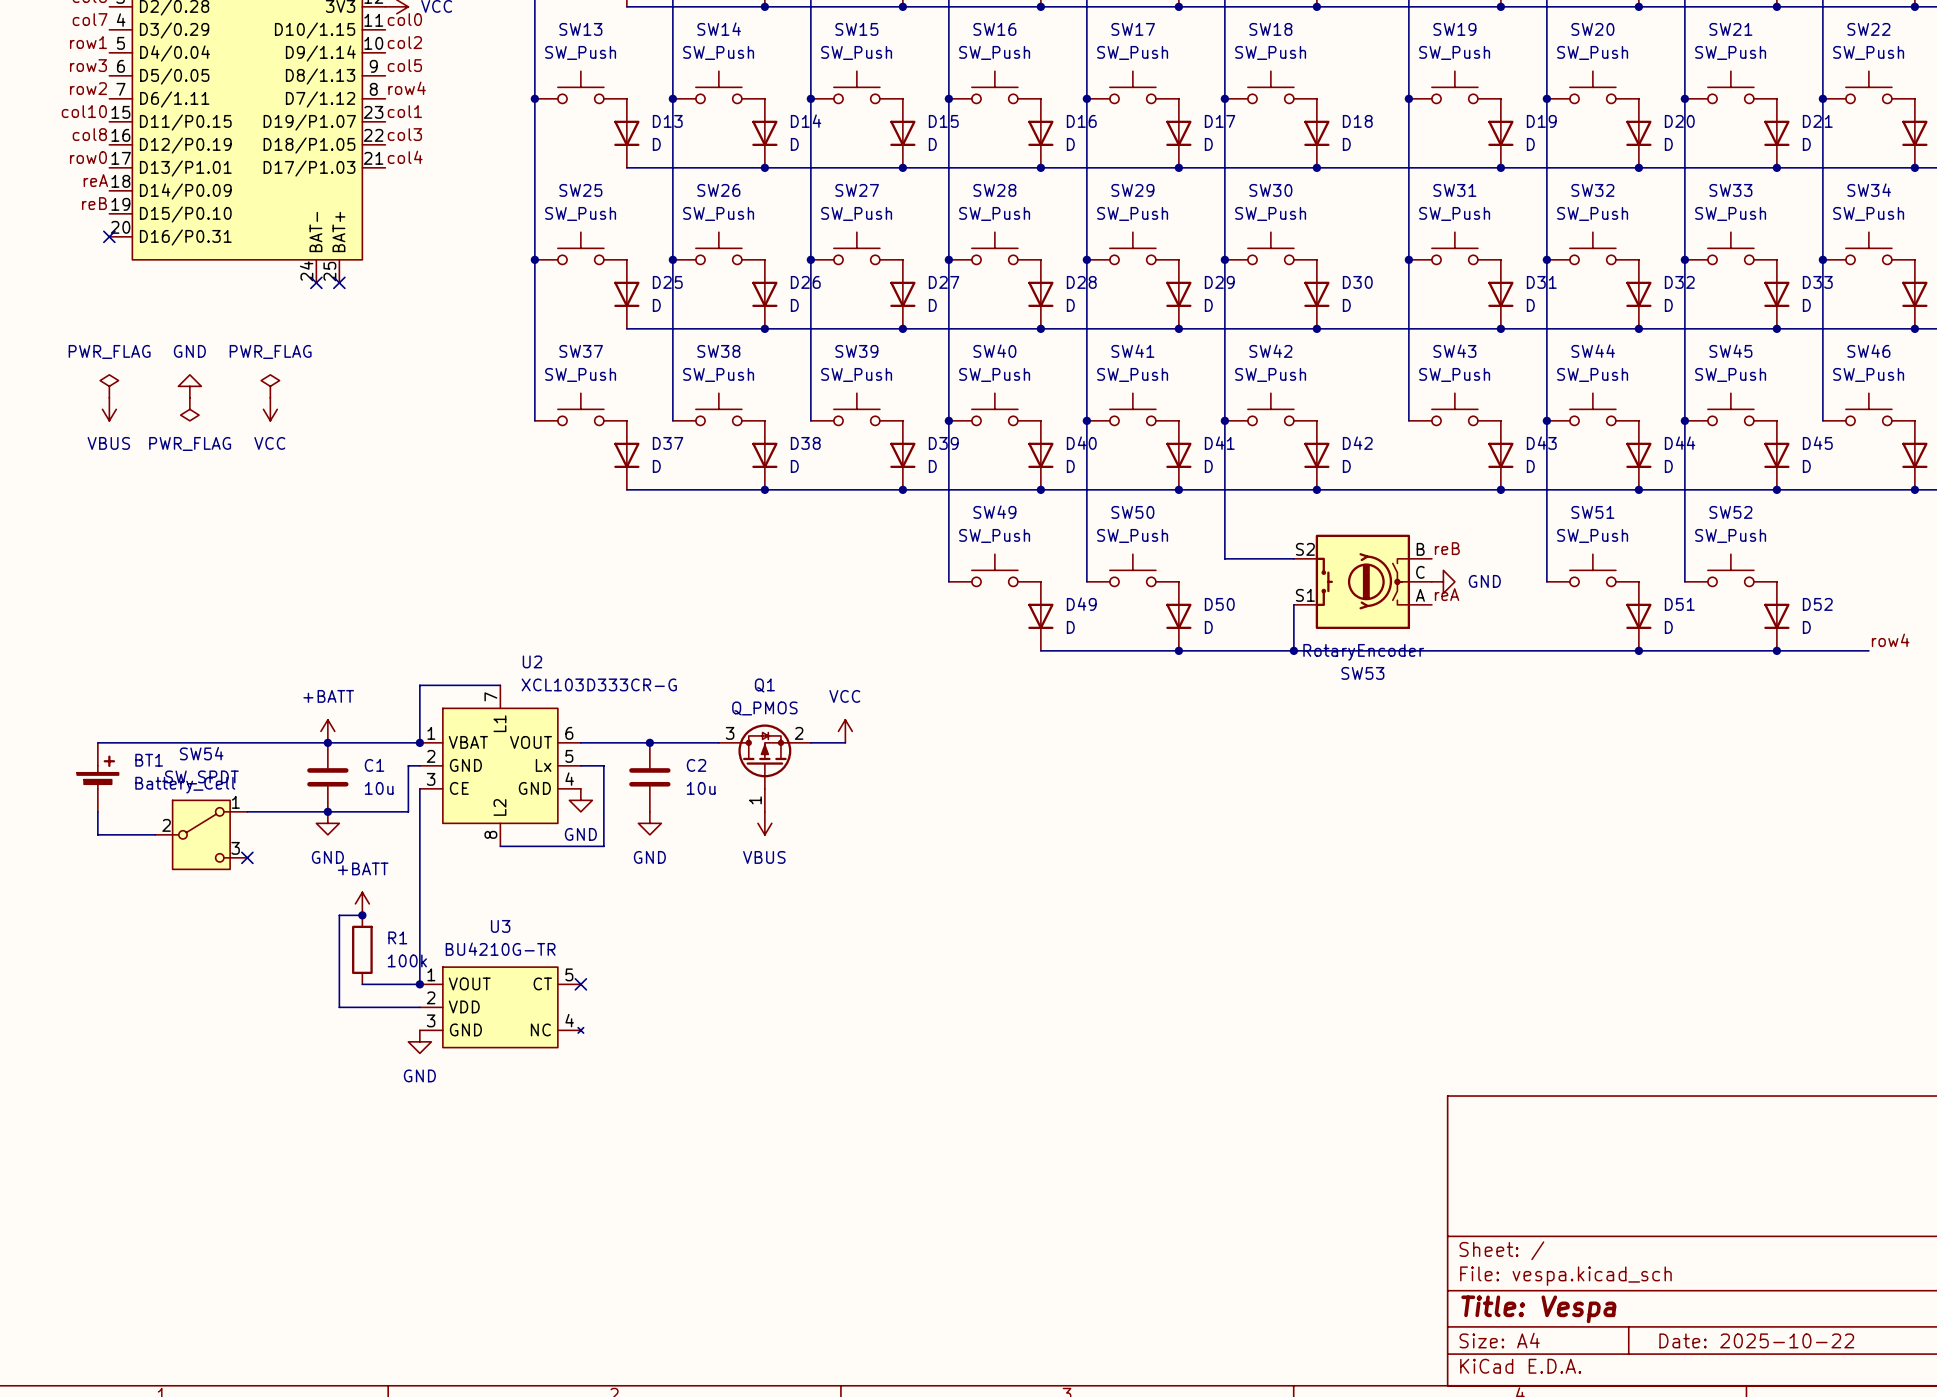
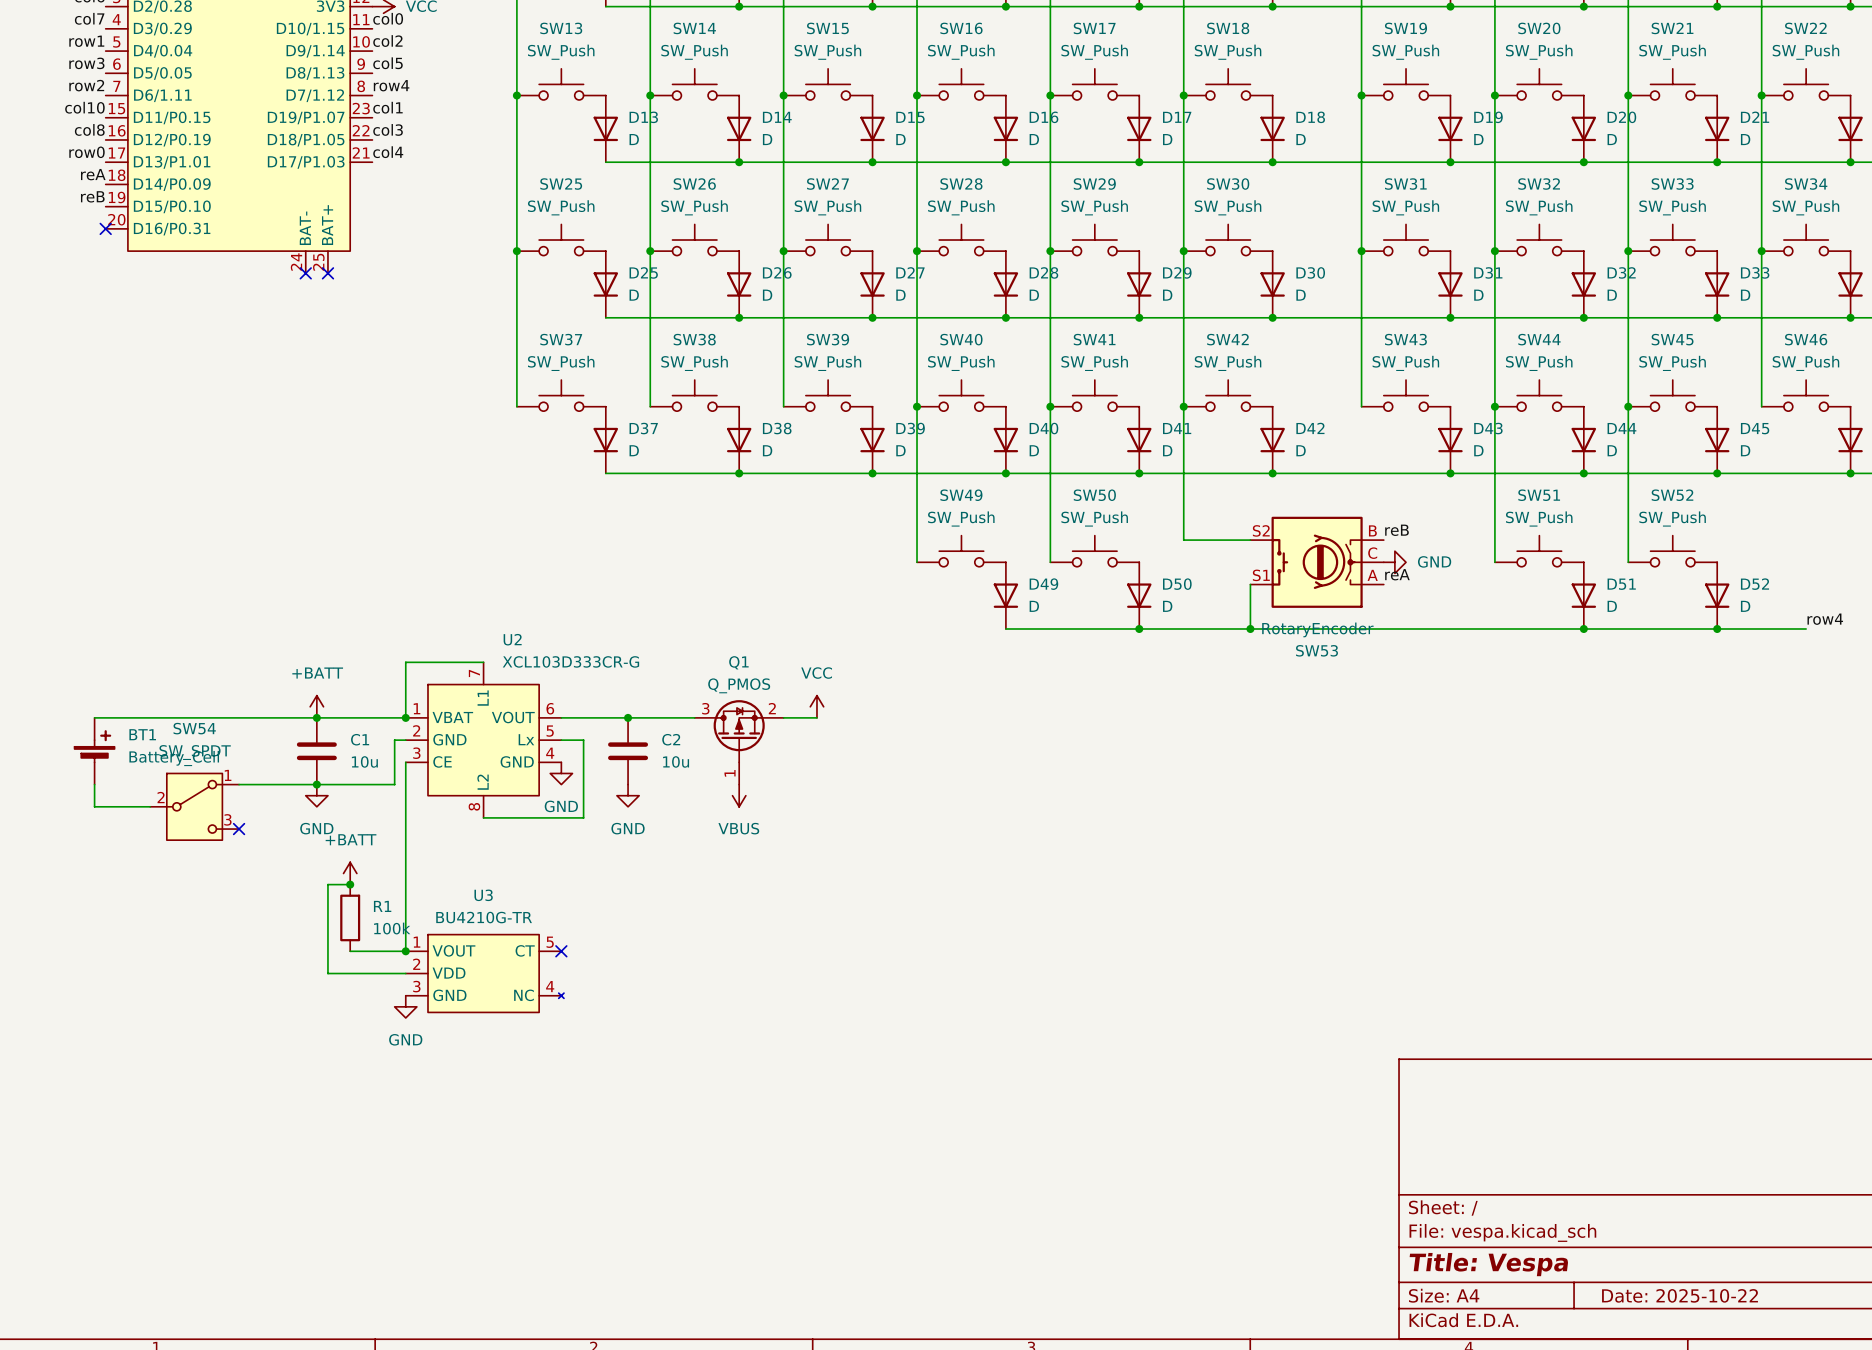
power symbol: PWR_FLAG (109, 386) -> none
power symbol: GND (189, 386) -> none
power symbol: PWR_FLAG (270, 386) -> none
power symbol: VBUS (109, 409) -> none
power symbol: PWR_FLAG (189, 409) -> none
power symbol: VCC (270, 409) -> none

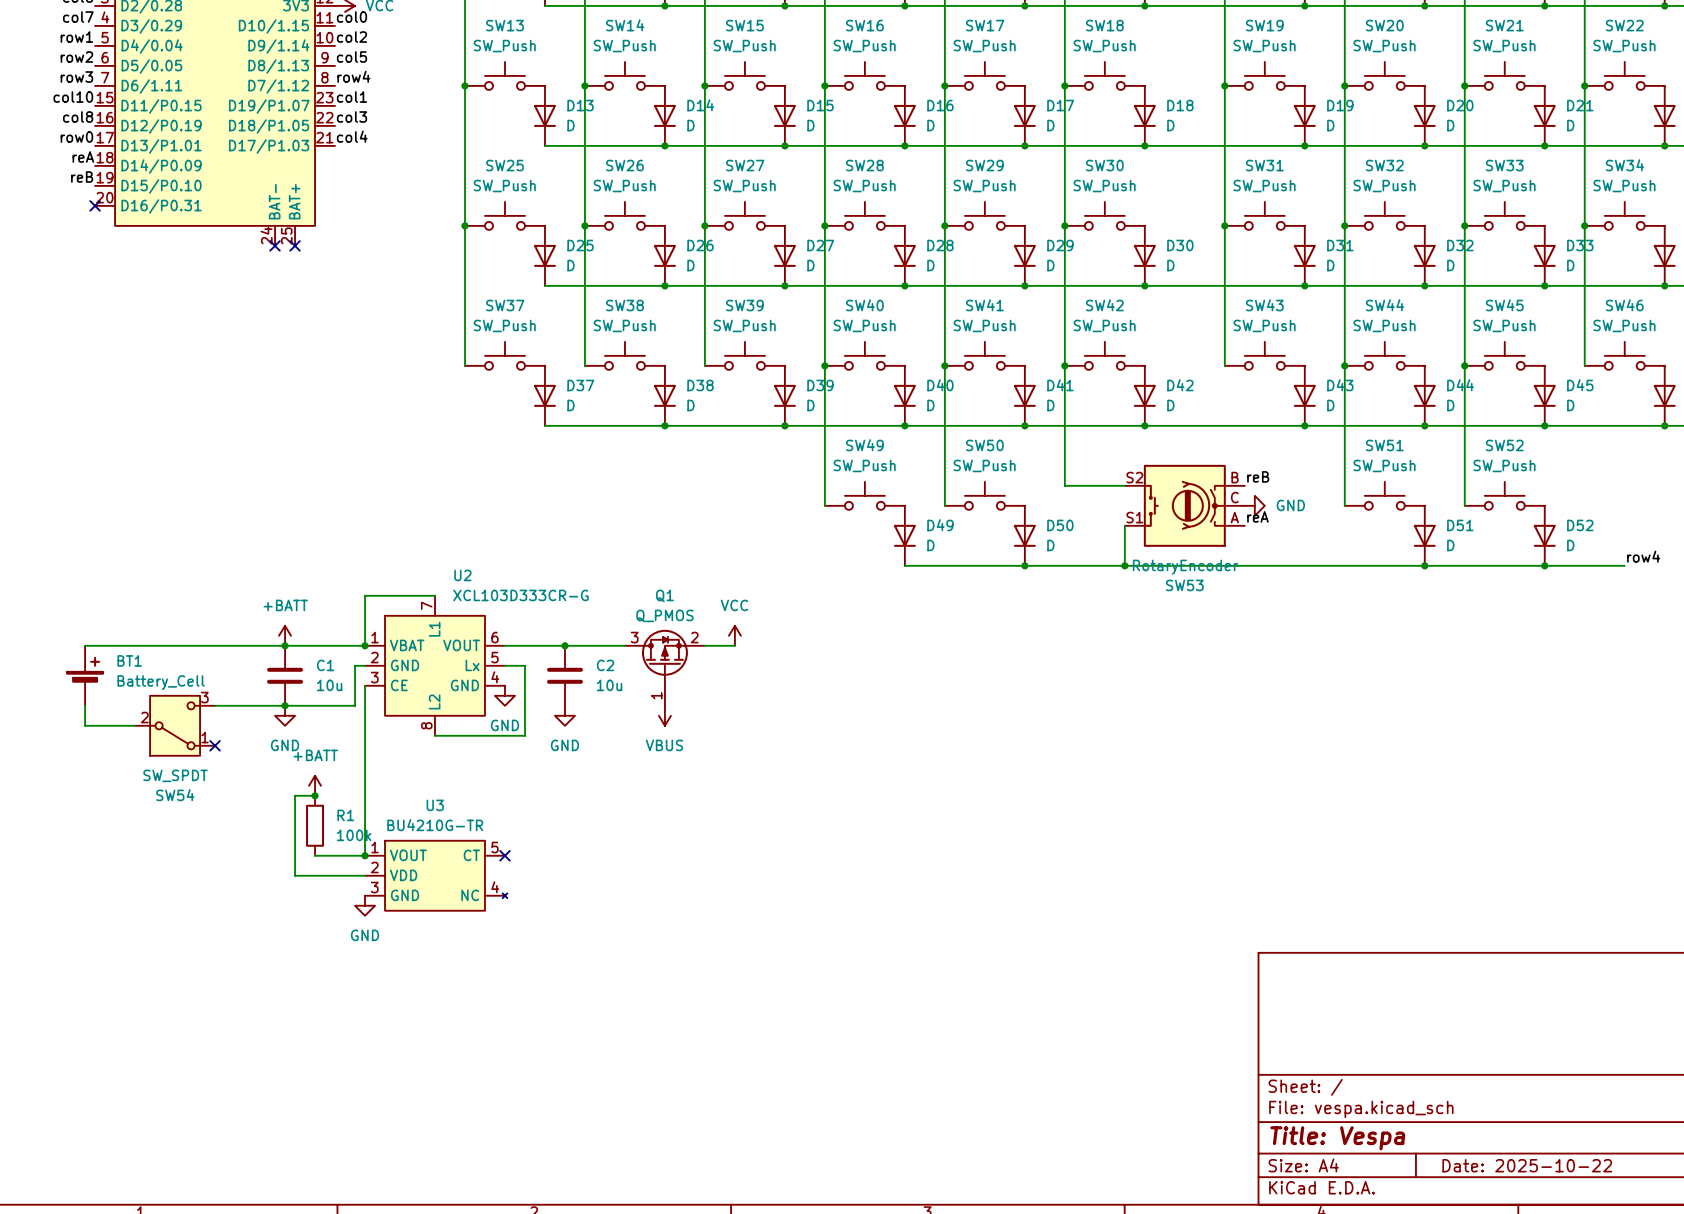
label: row3 (86, 63) -> row2 (76, 57)
label: row2 (86, 85) -> row3 (76, 77)
SW54 flip: as is (194, 806) -> up-down (175, 725)

